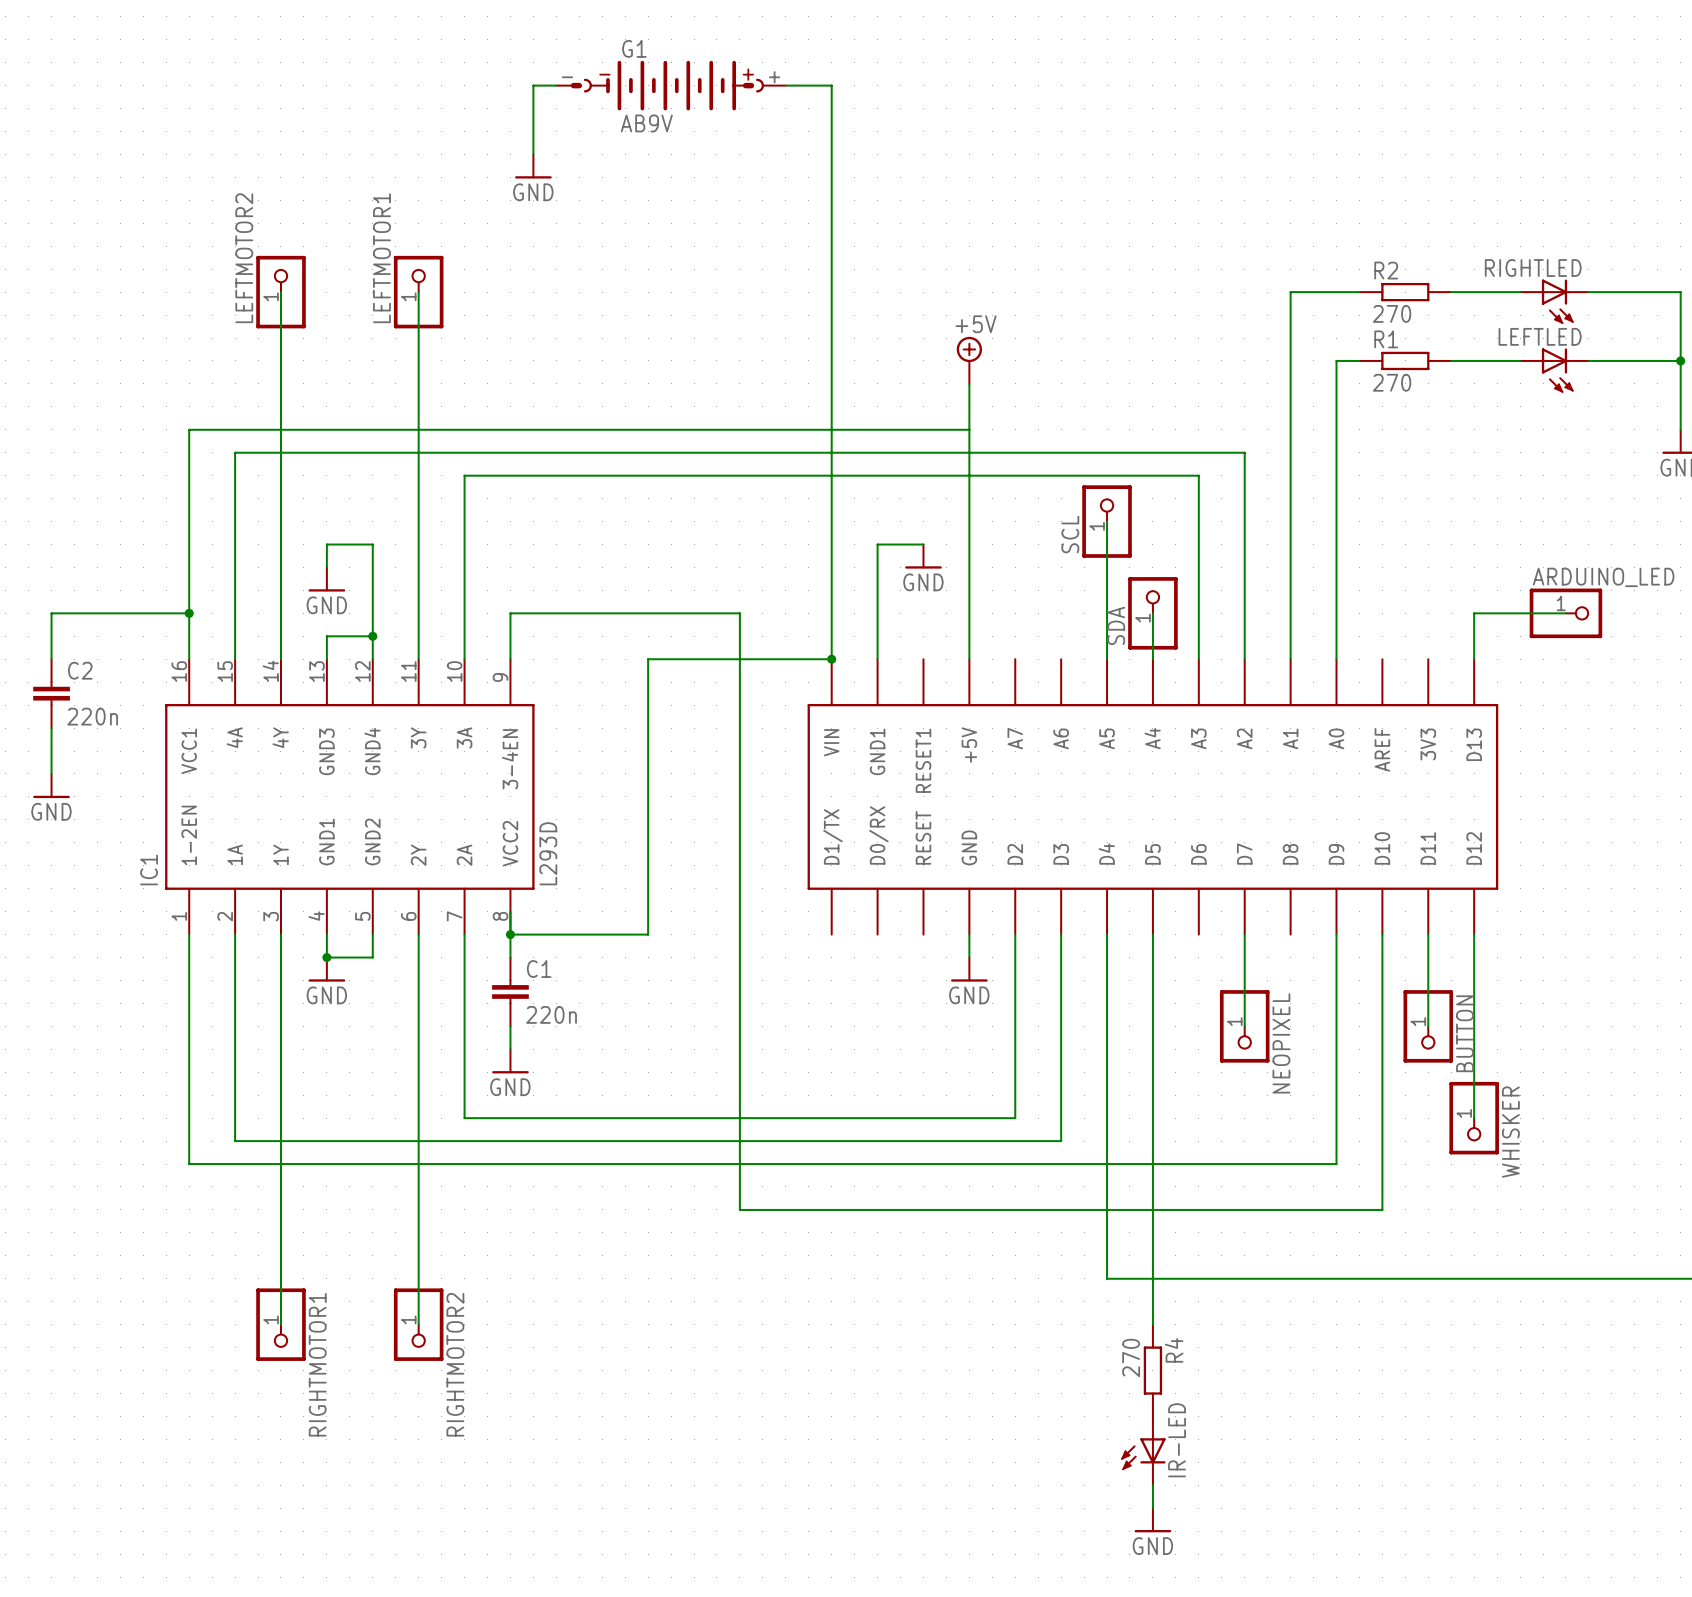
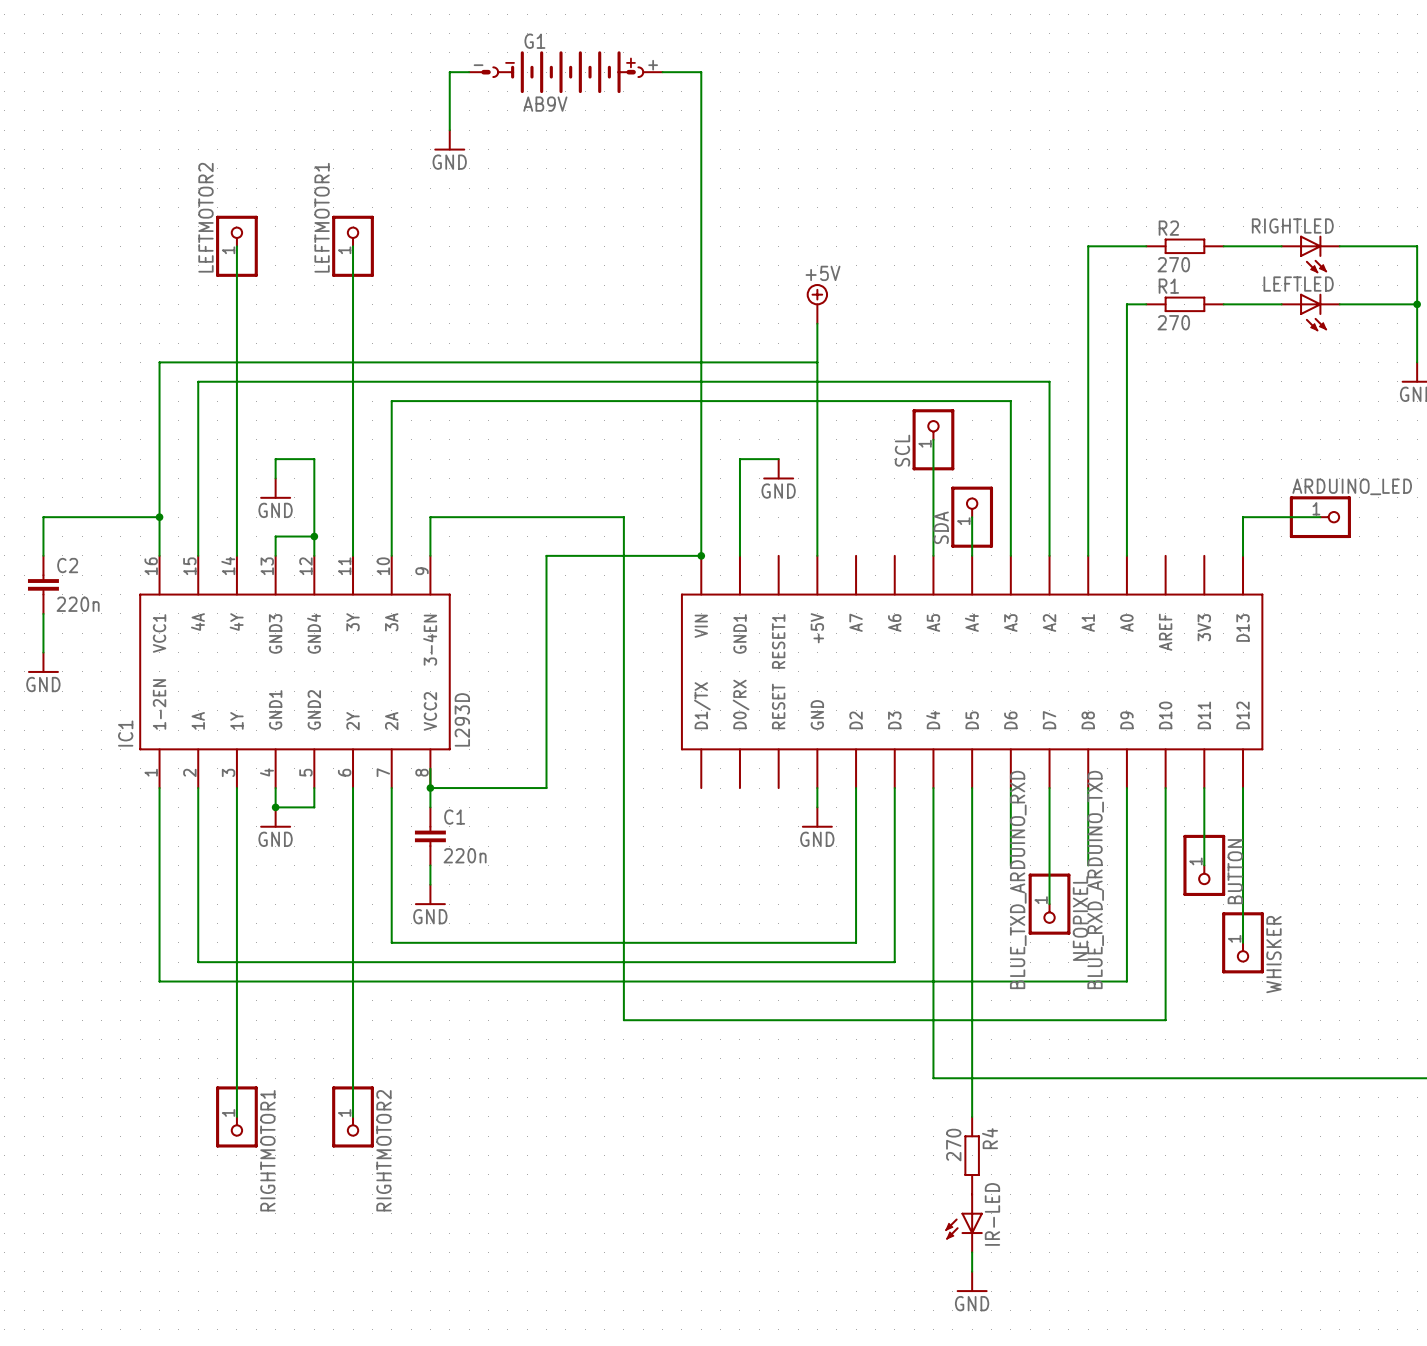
wire: none -> (1010, 788) (1010, 865)
wire: none -> (1088, 788) (1088, 865)
wire: none -> (1049, 865) (1049, 904)
NEOPIXEL position: (1244, 1026) -> (1049, 904)
label: none -> BLUE_TXD_ARDUINO_RXD (1018, 879)
label: none -> BLUE_RXD_ARDUINO_TXD (1095, 879)

